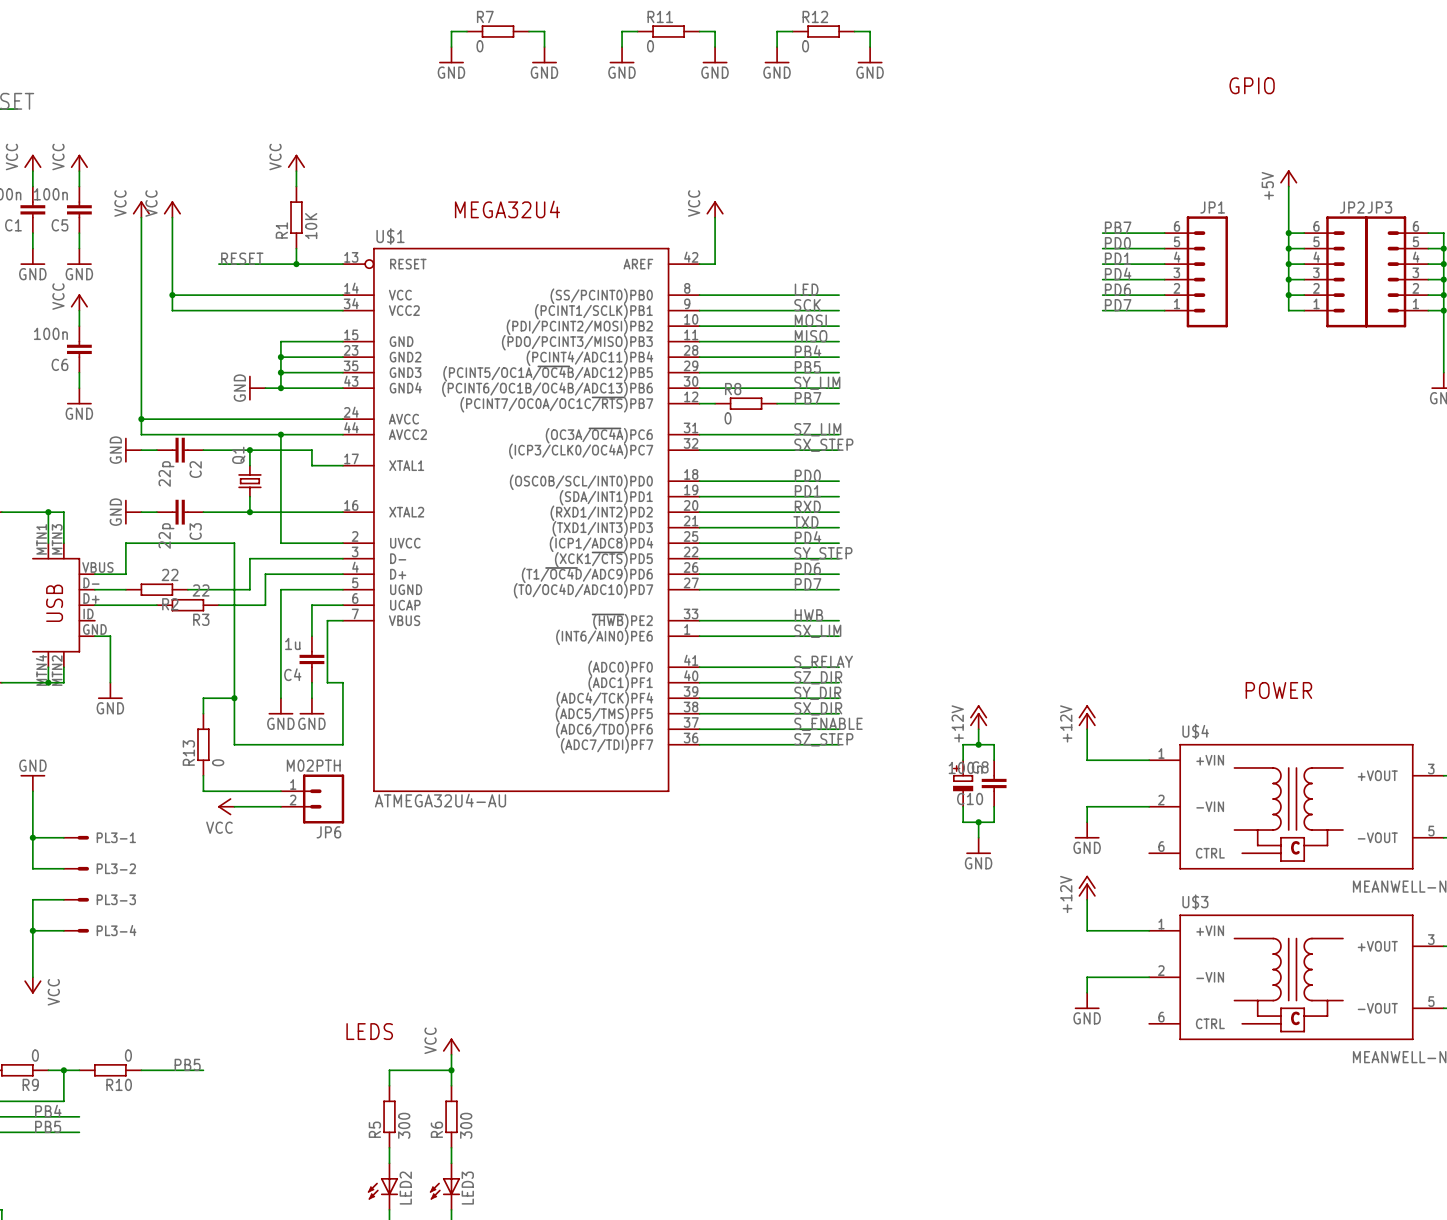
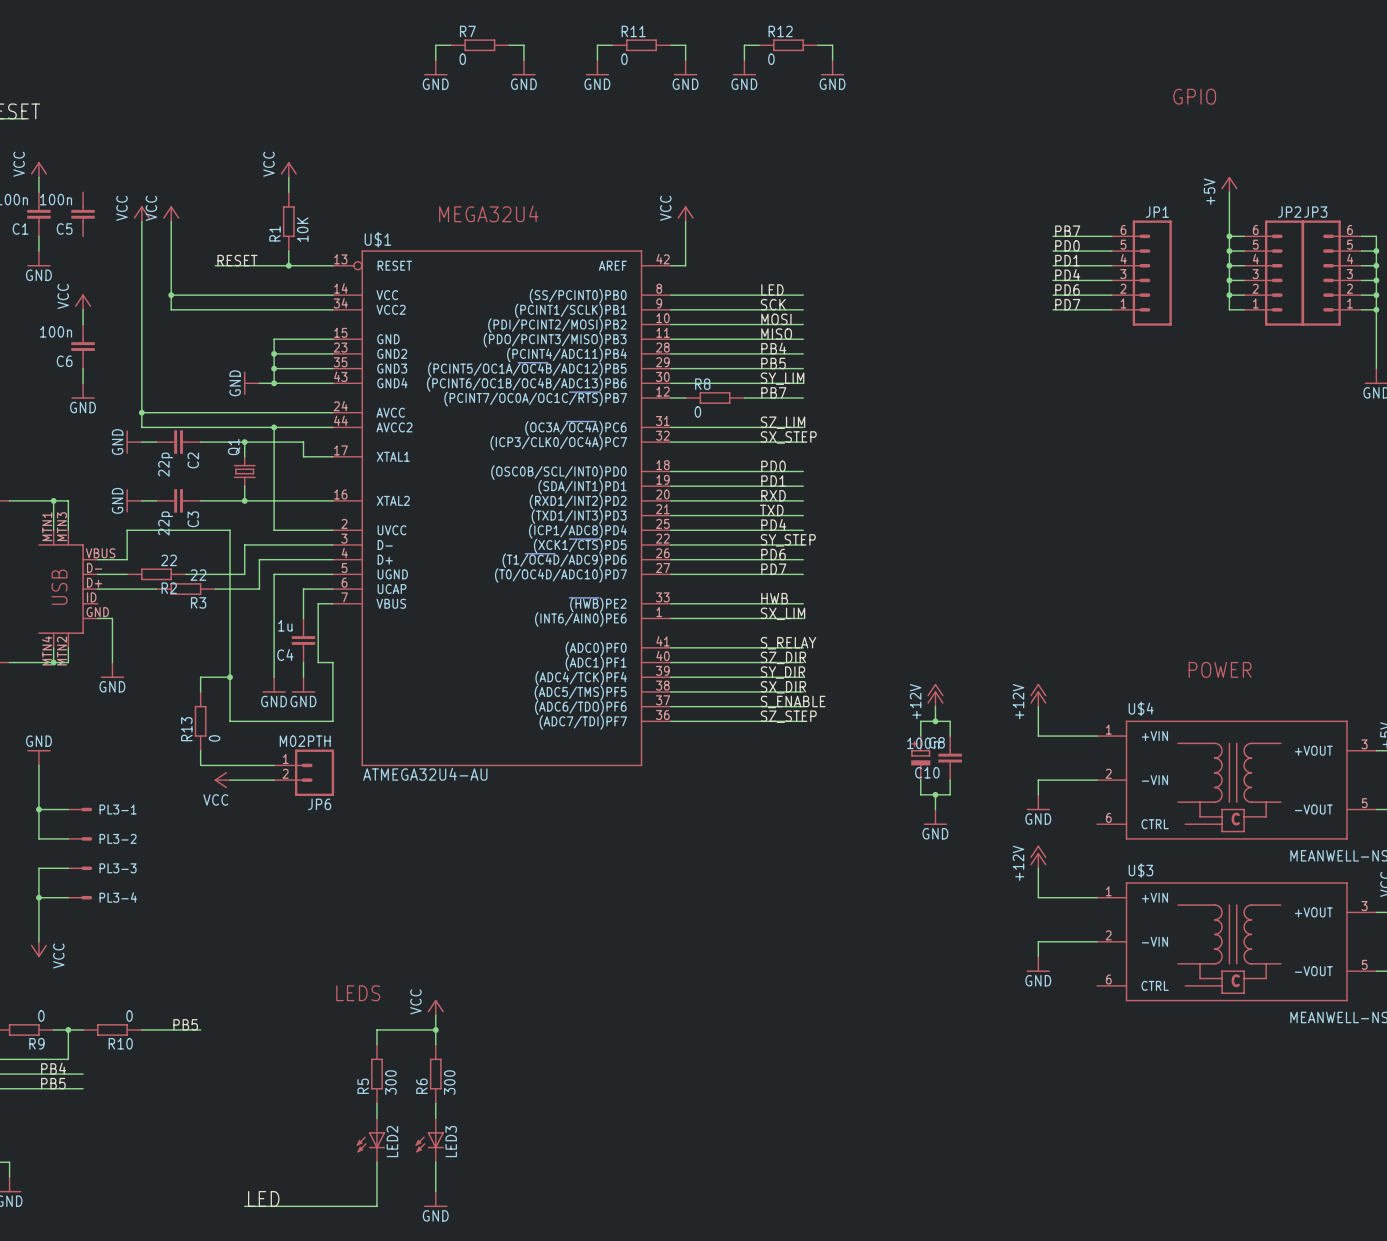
power symbol: VCC (79, 162) -> none
wire: (79, 171) (79, 186) -> none
wire: (79, 233) (79, 248) -> none
power symbol: GND (79, 256) -> none

